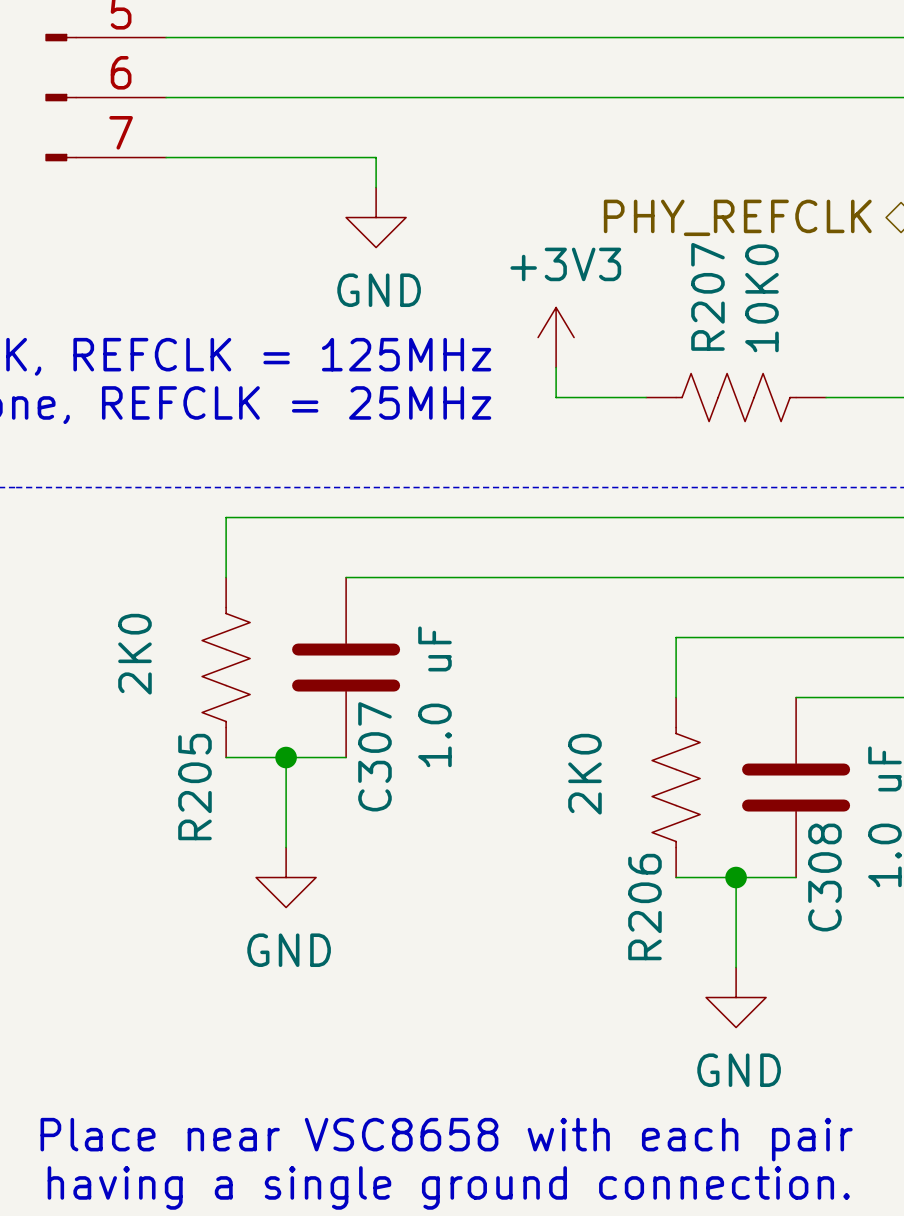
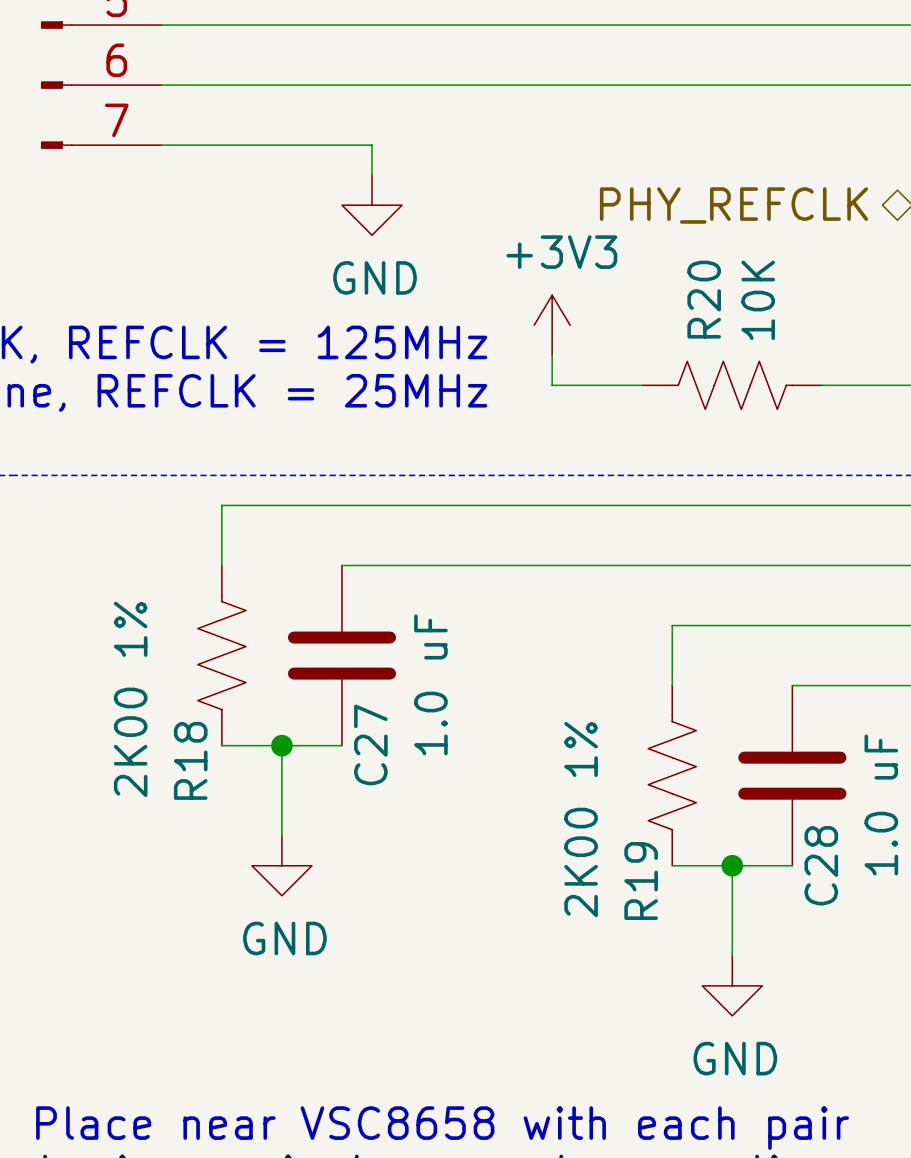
R207 name: R207 (707, 296) -> R20 (704, 299)
R207 value: 10K0 (761, 298) -> 10K (758, 300)
R205 value: 2K0 (134, 654) -> 2K00 1% (130, 699)
C307 name: C307 (374, 756) -> C27 (370, 744)
R206 value: 2K0 (584, 774) -> 2K00 1% (581, 819)
R205 name: R205 (194, 787) -> R18 (190, 760)
C308 name: C308 (824, 877) -> C28 (821, 865)
R206 name: R206 (644, 907) -> R19 (641, 880)

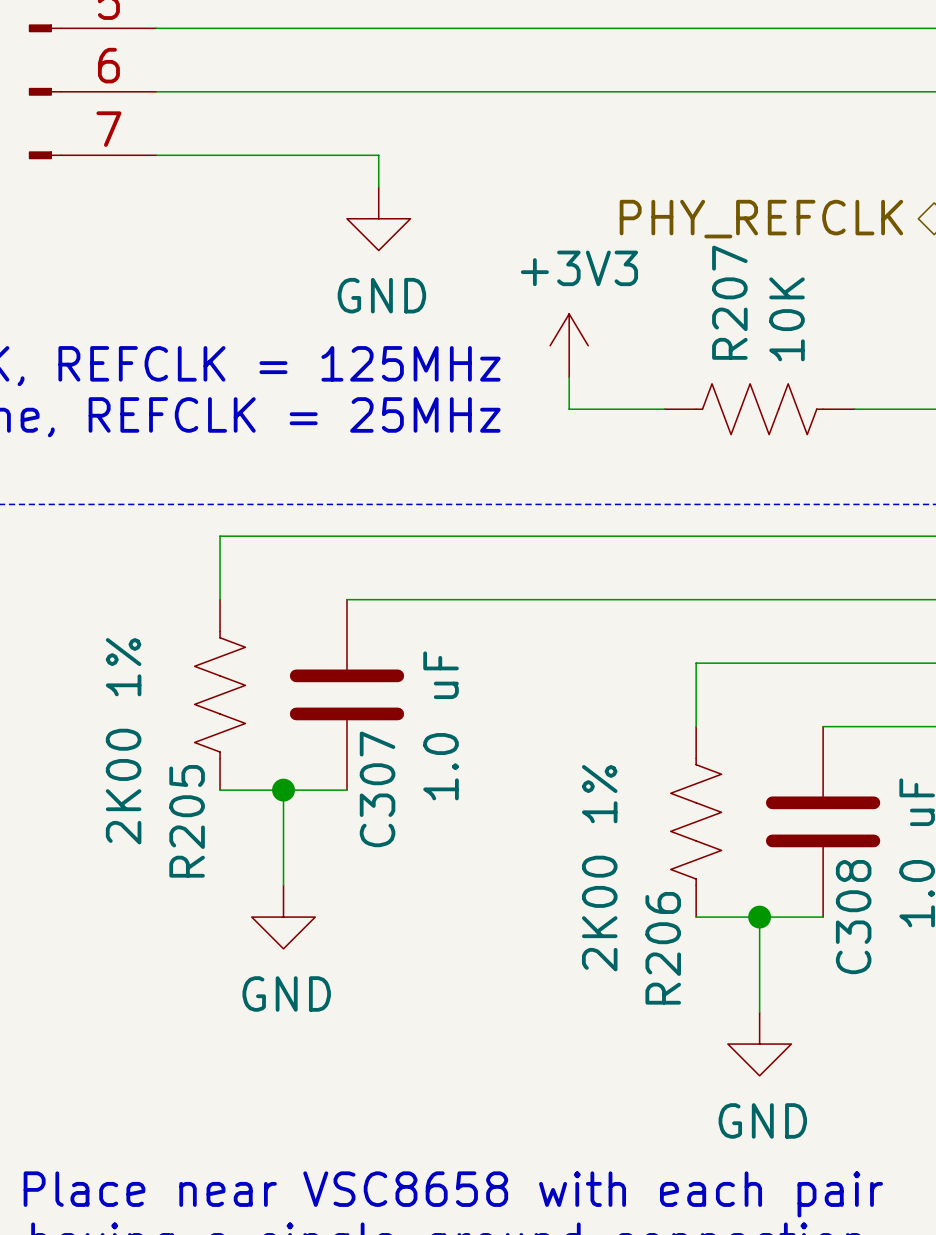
R20 name: R20 (704, 299) -> R207 (729, 302)
C27 name: C27 (370, 744) -> C307 (377, 789)
R18 name: R18 (190, 760) -> R205 (187, 821)
C28 name: C28 (821, 865) -> C308 (853, 917)
R19 name: R19 (641, 880) -> R206 (663, 948)

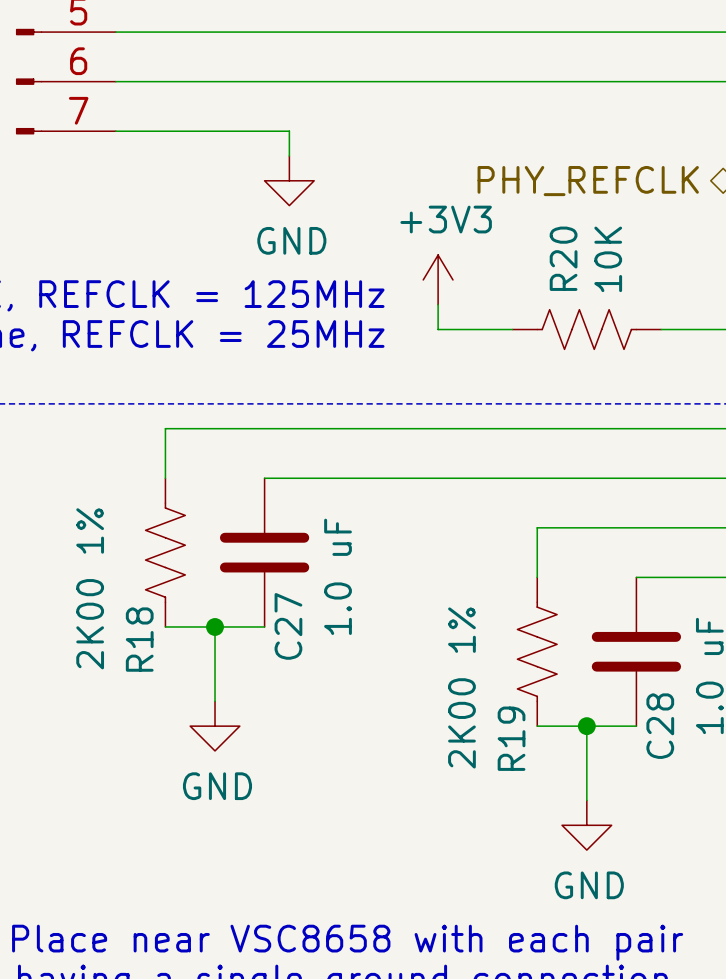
R207 name: R207 (729, 302) -> R20 (563, 258)
C307 name: C307 (377, 789) -> C27 (288, 626)
R205 name: R205 (187, 821) -> R18 (139, 639)
C308 name: C308 (853, 917) -> C28 (660, 726)
R206 name: R206 (663, 948) -> R19 (511, 738)

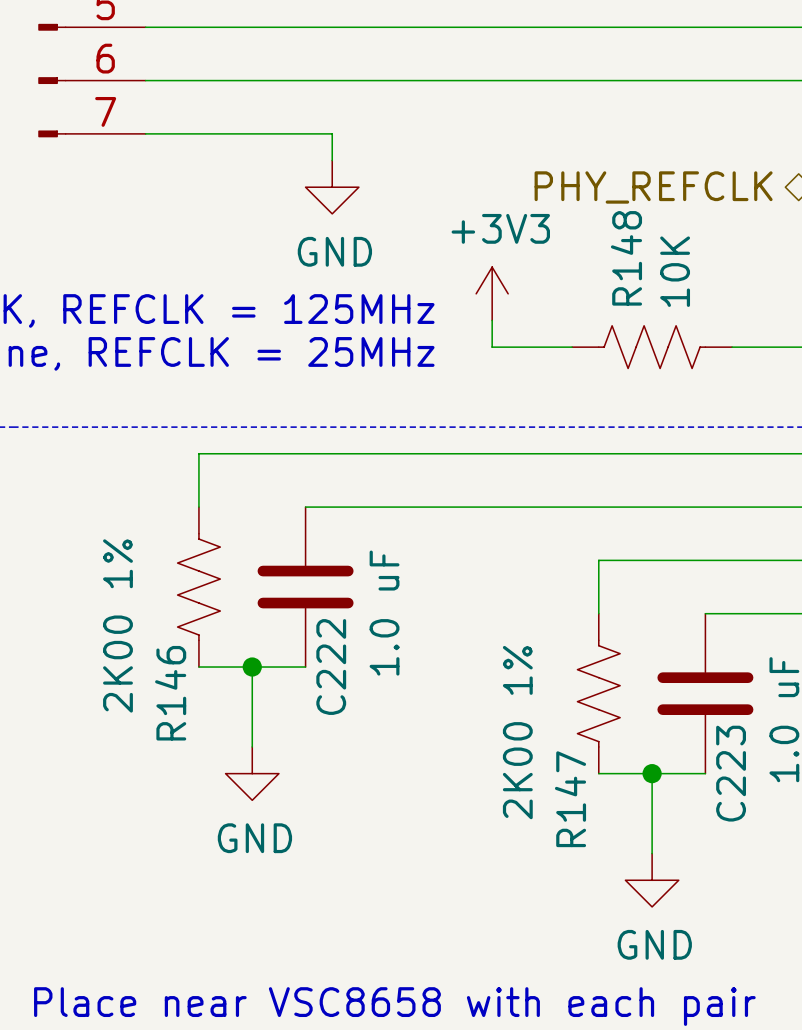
R20 name: R20 (563, 258) -> R148 (626, 258)
C27 name: C27 (288, 626) -> C222 (331, 667)
R18 name: R18 (139, 639) -> R146 (170, 693)
C28 name: C28 (660, 726) -> C223 (731, 773)
R19 name: R19 (511, 738) -> R147 (570, 799)

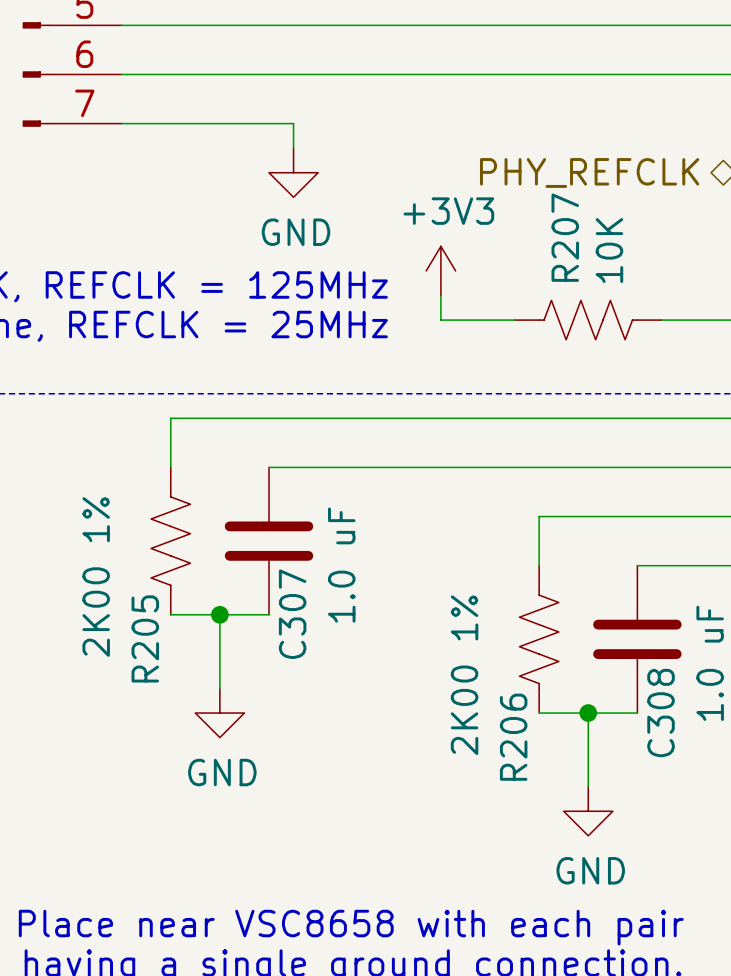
R148 name: R148 (626, 258) -> R207 (565, 237)
C222 name: C222 (331, 667) -> C307 (292, 614)
R146 name: R146 (170, 693) -> R205 (145, 638)
C223 name: C223 (731, 773) -> C308 (661, 713)
R147 name: R147 (570, 799) -> R206 (513, 737)

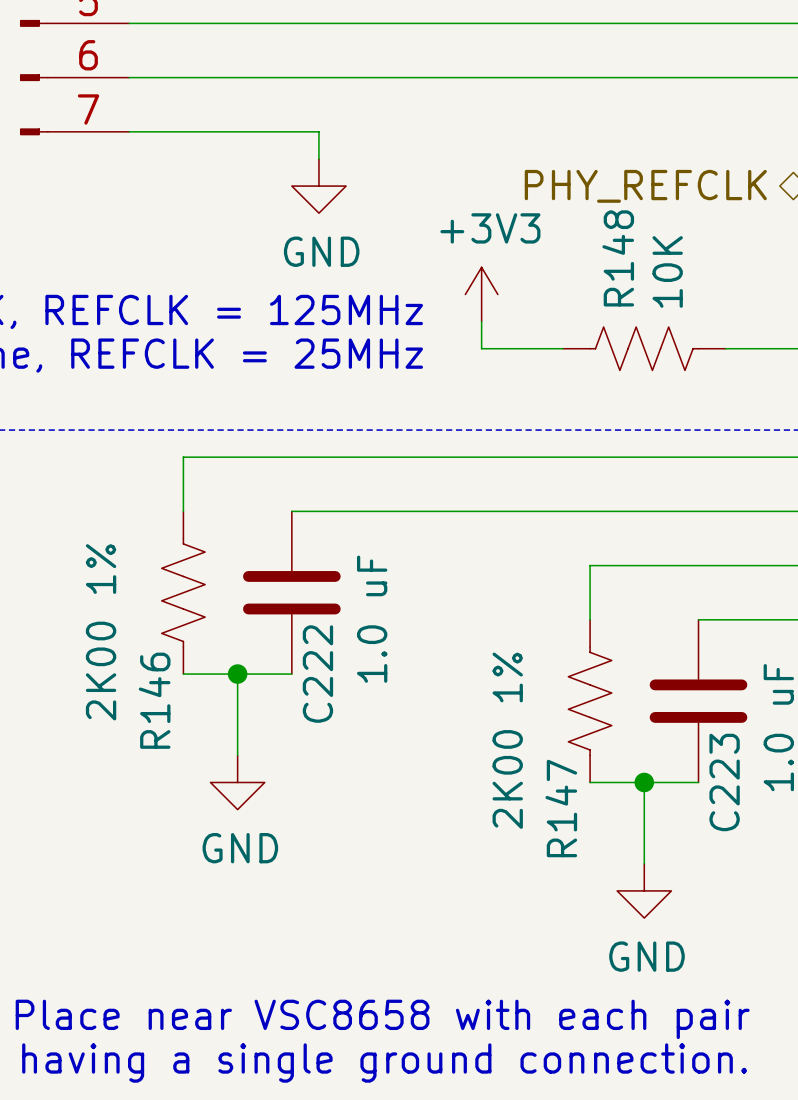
R207 name: R207 (565, 237) -> R148 (618, 258)
C307 name: C307 (292, 614) -> C222 (317, 674)
R205 name: R205 (145, 638) -> R146 (154, 700)
C308 name: C308 (661, 713) -> C223 (724, 782)
R206 name: R206 (513, 737) -> R147 (561, 808)

